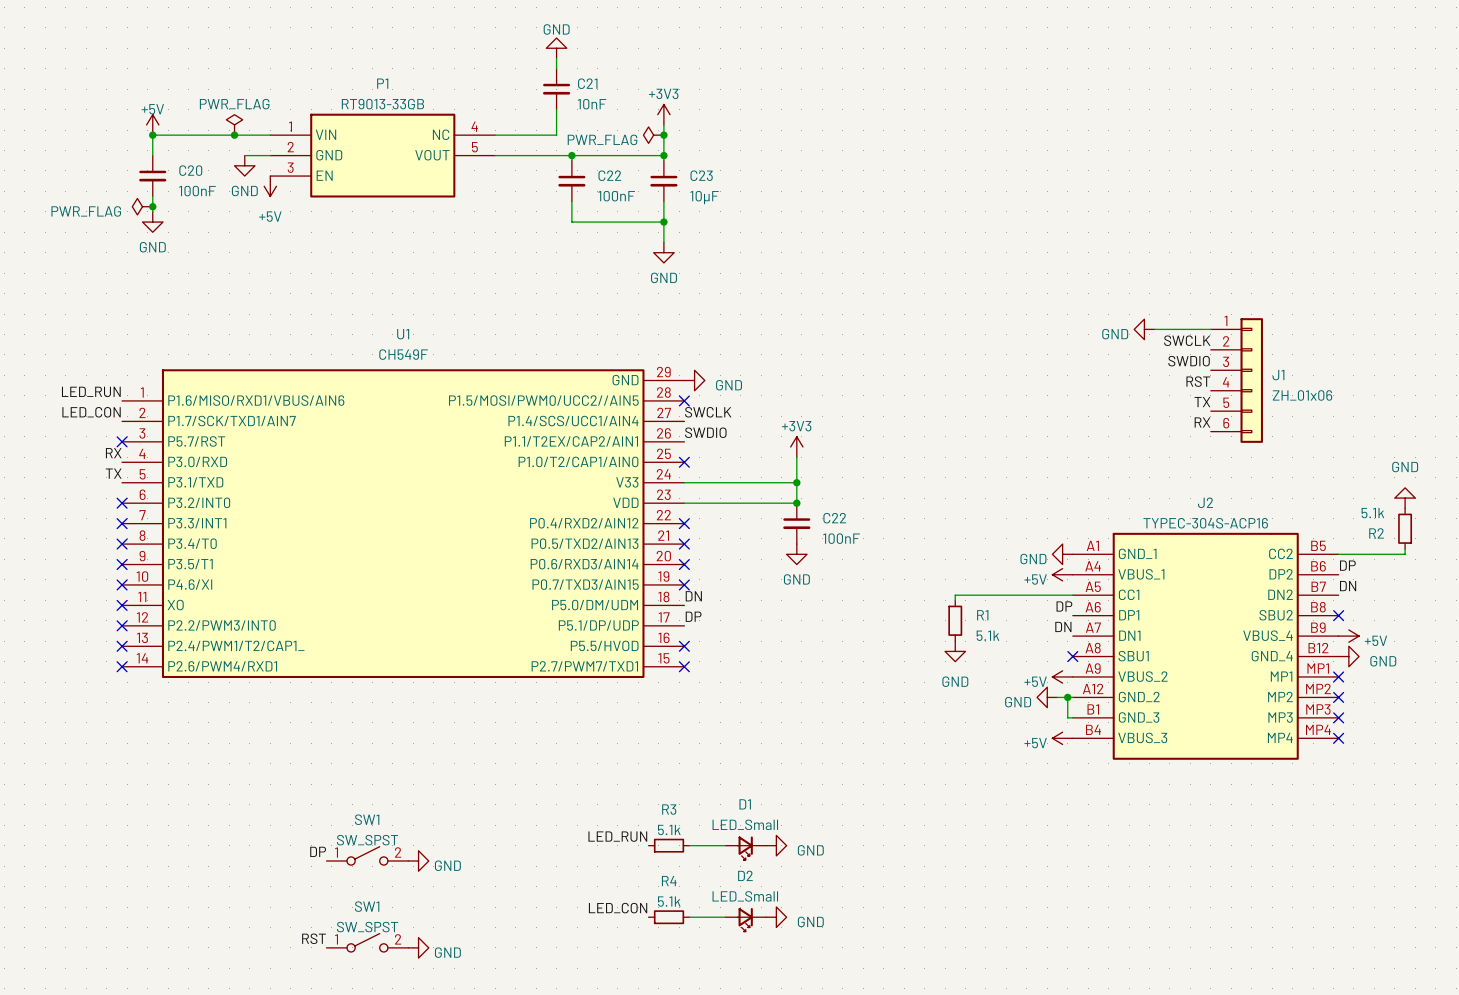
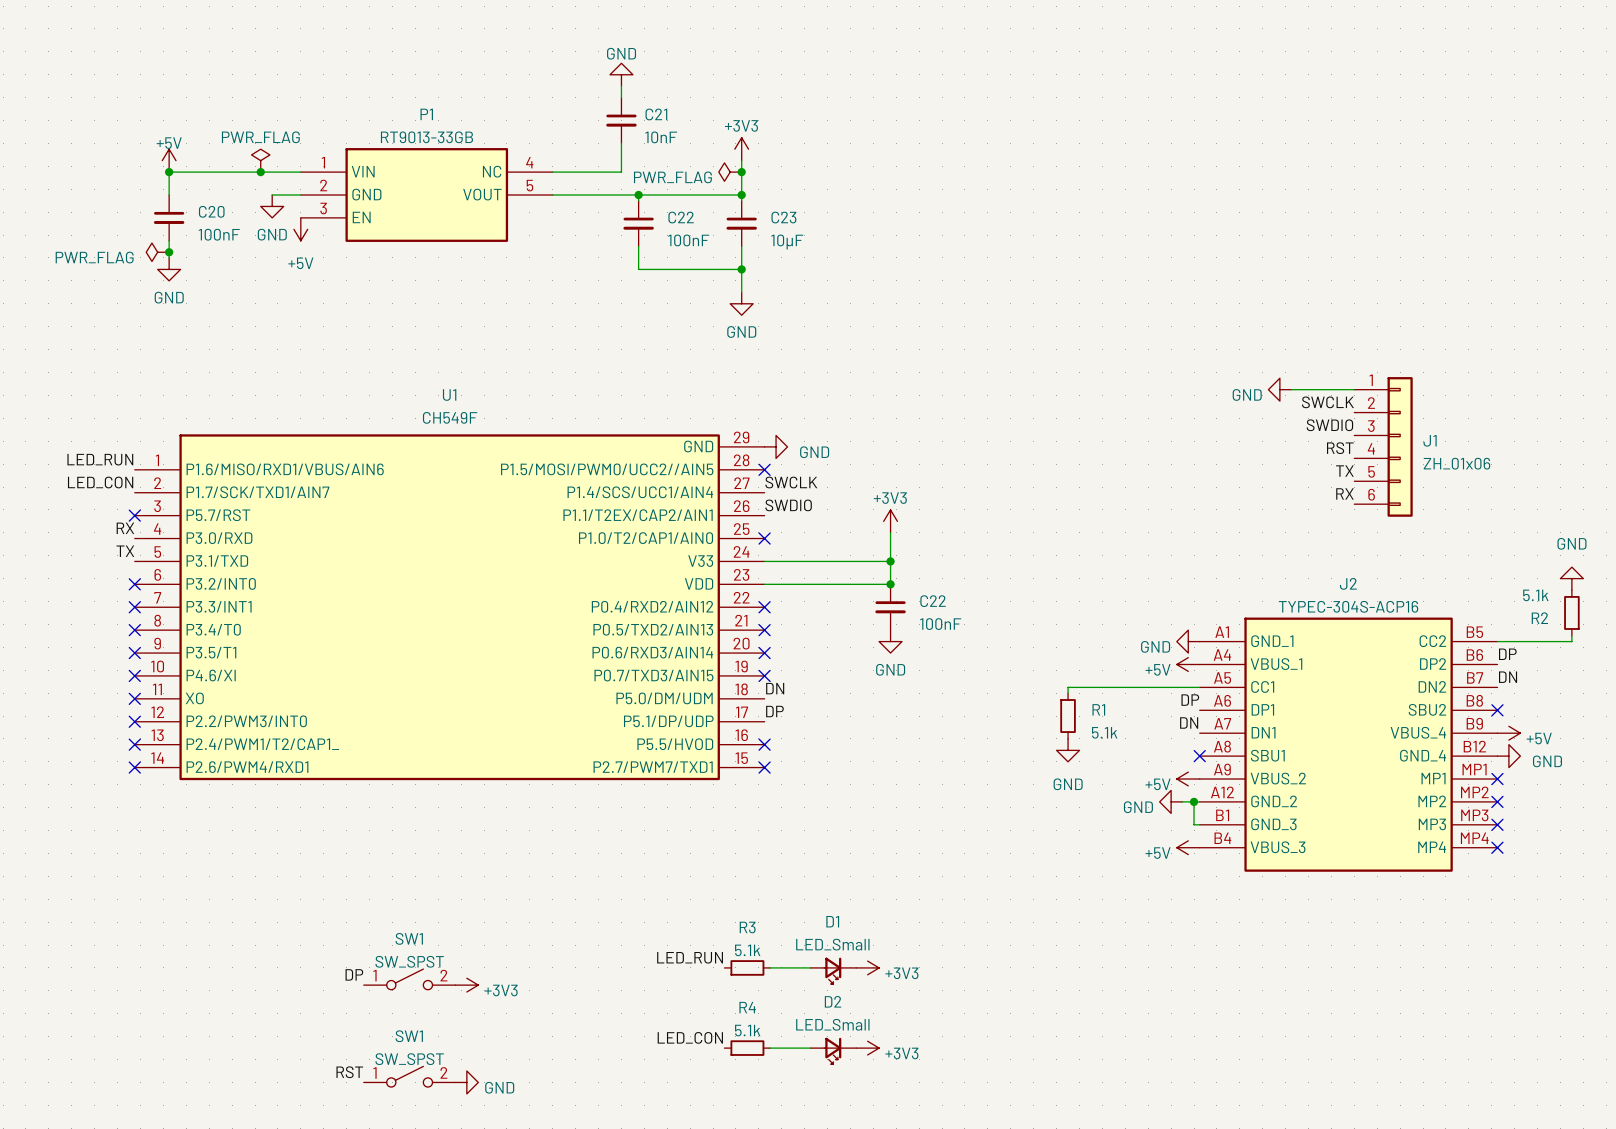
power symbol: GND (776, 845) -> +3V3 (867, 967)
power symbol: GND (418, 860) -> +3V3 (466, 985)
power symbol: GND (776, 917) -> +3V3 (867, 1048)

